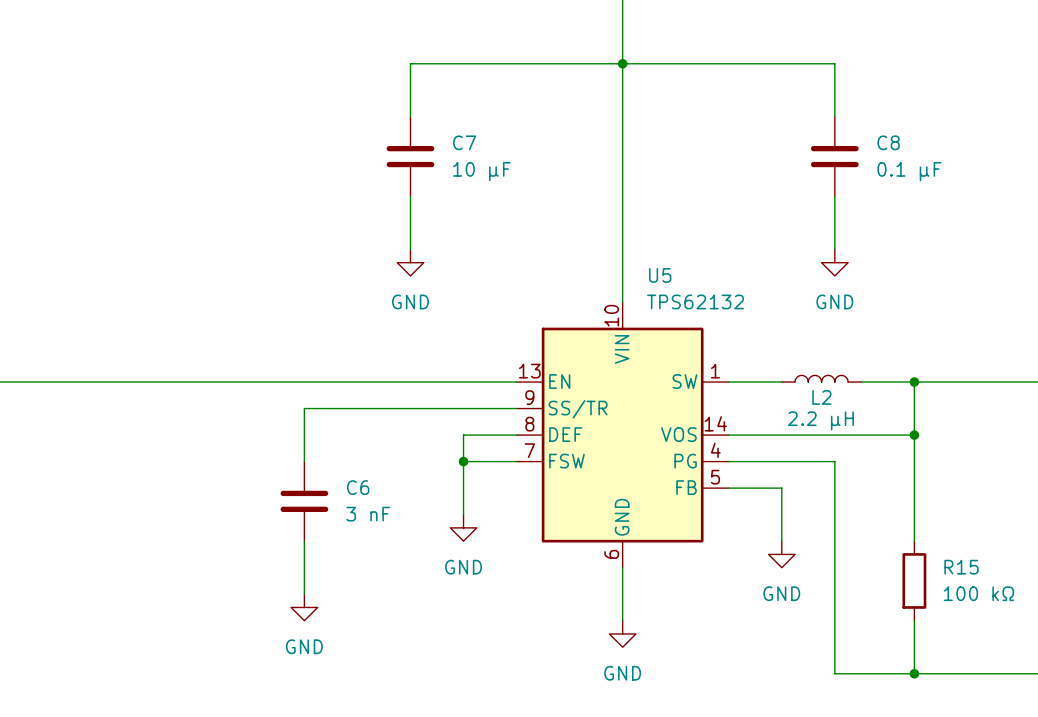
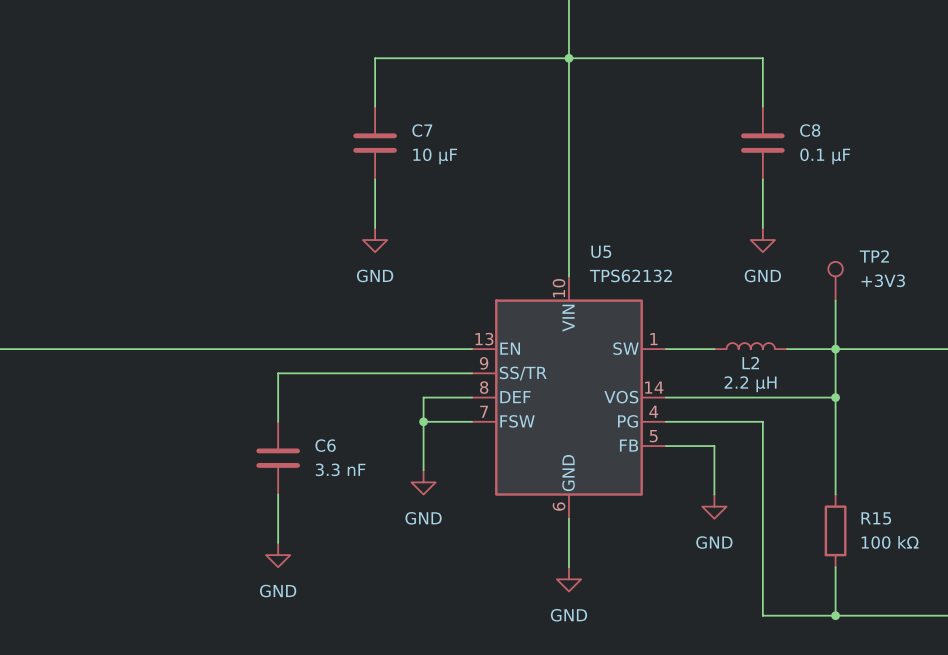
TP2: none -> +3V3 (835, 281)
wire: none -> (835, 300) (835, 349)
C6 value: 3 nF (368, 514) -> 3.3 nF (340, 469)

